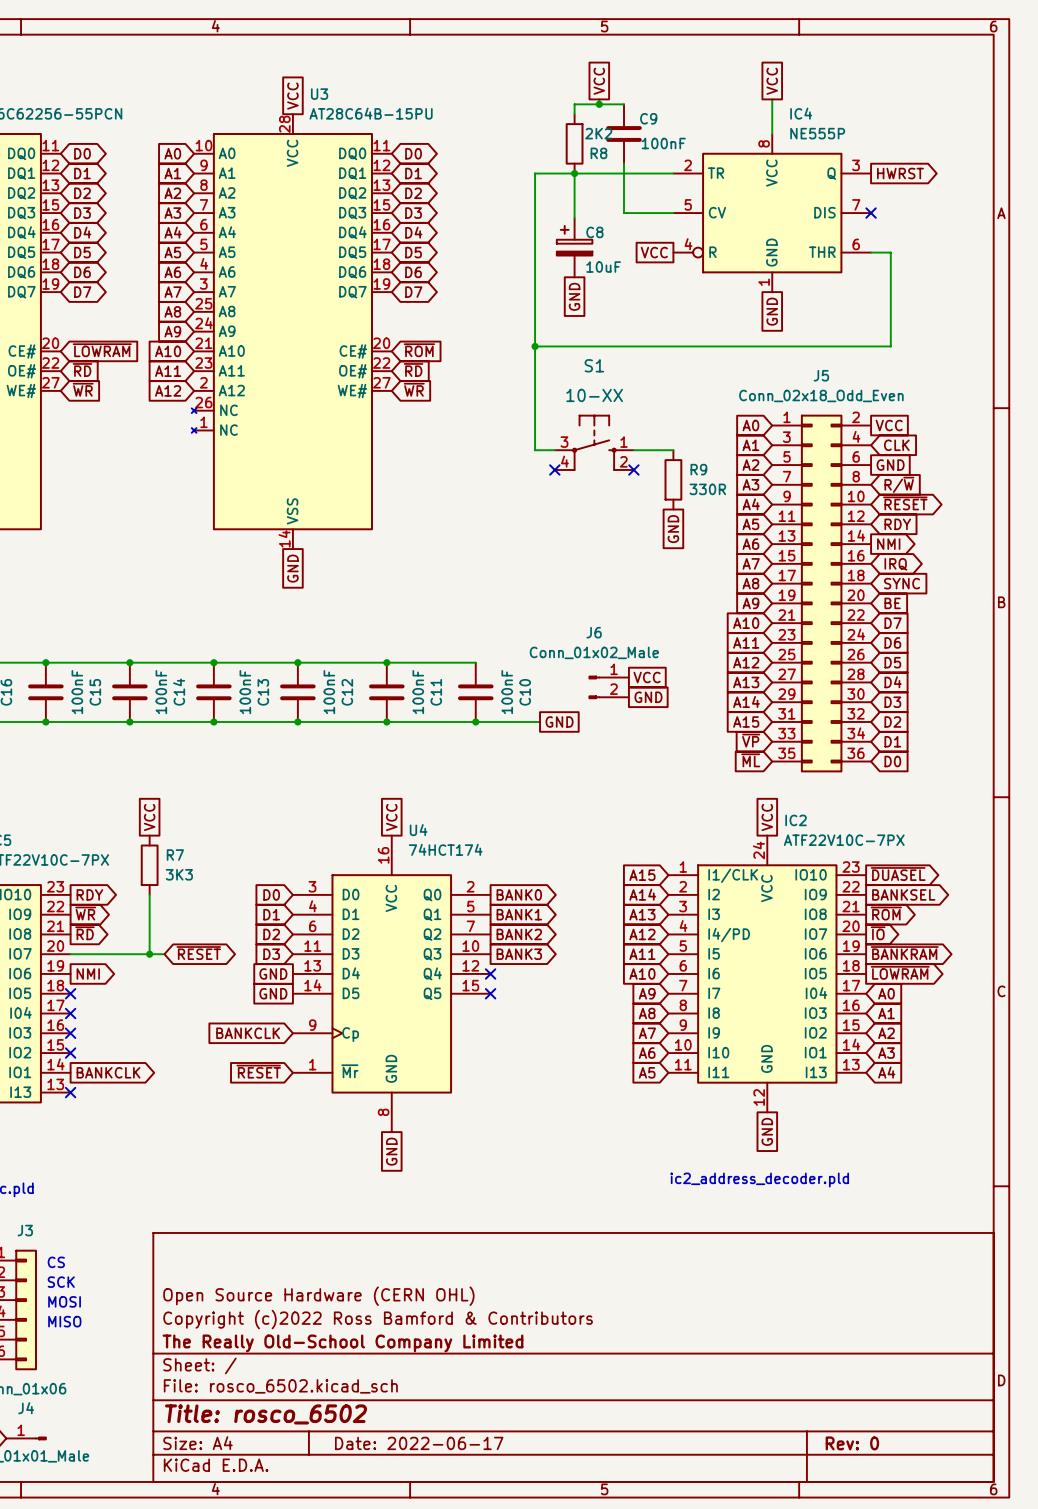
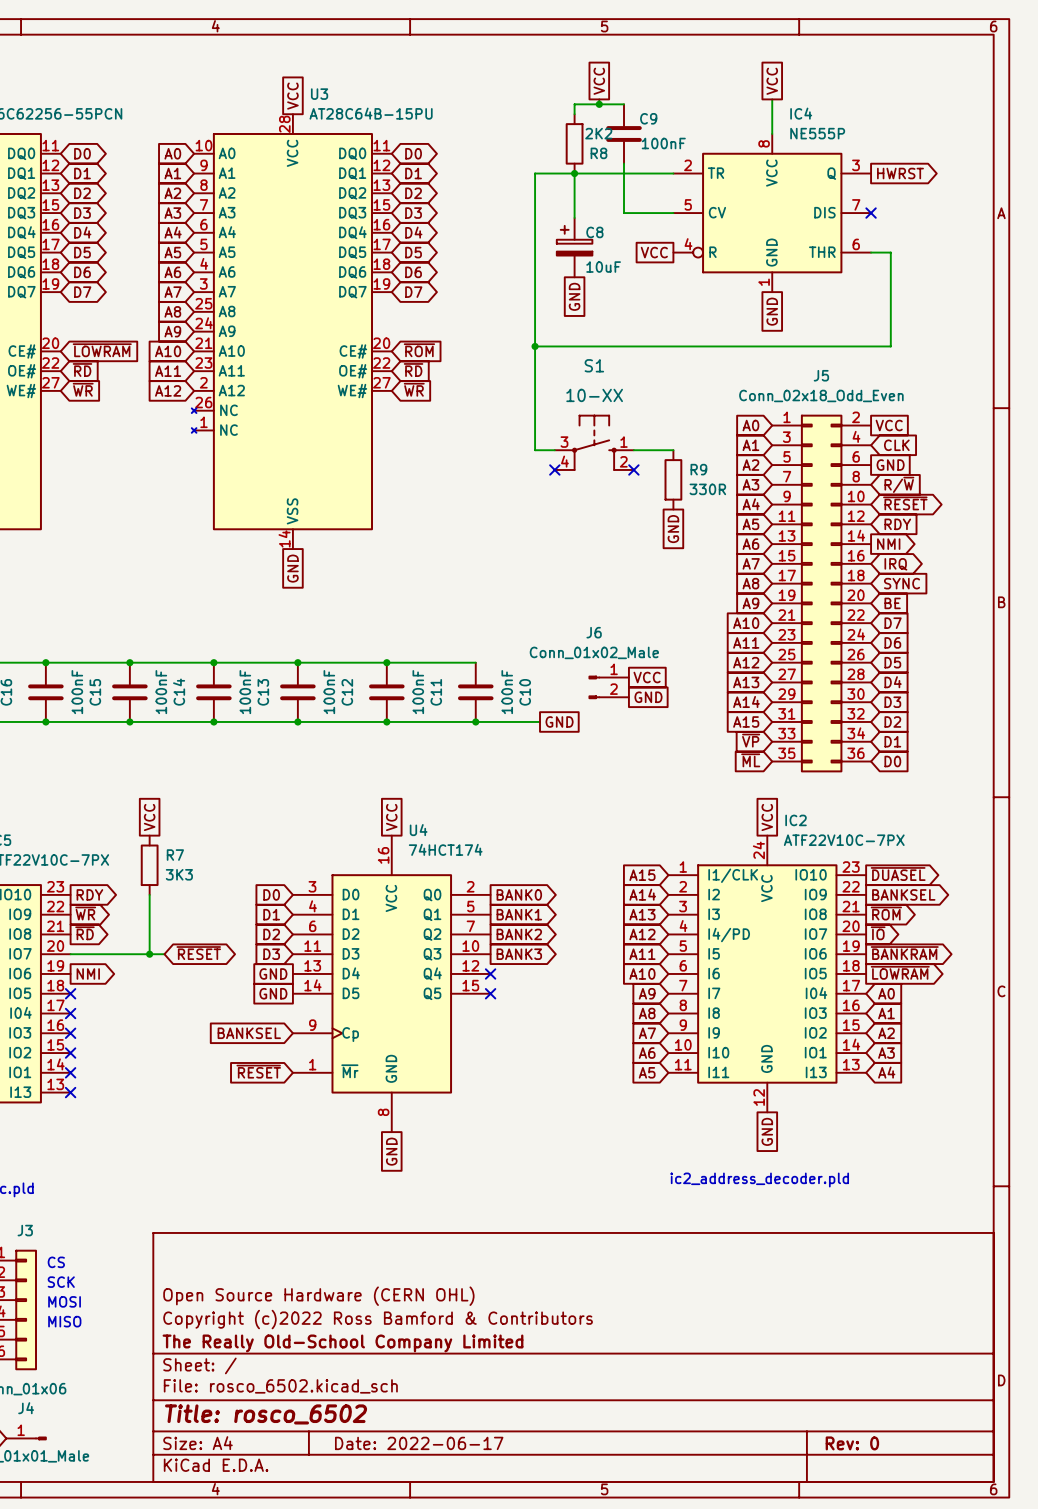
global label: BANKCLK (248, 1033) -> BANKSEL (249, 1033)
no-connect mark: none -> (70, 1072)
global label: BANKCLK (108, 1072) -> none

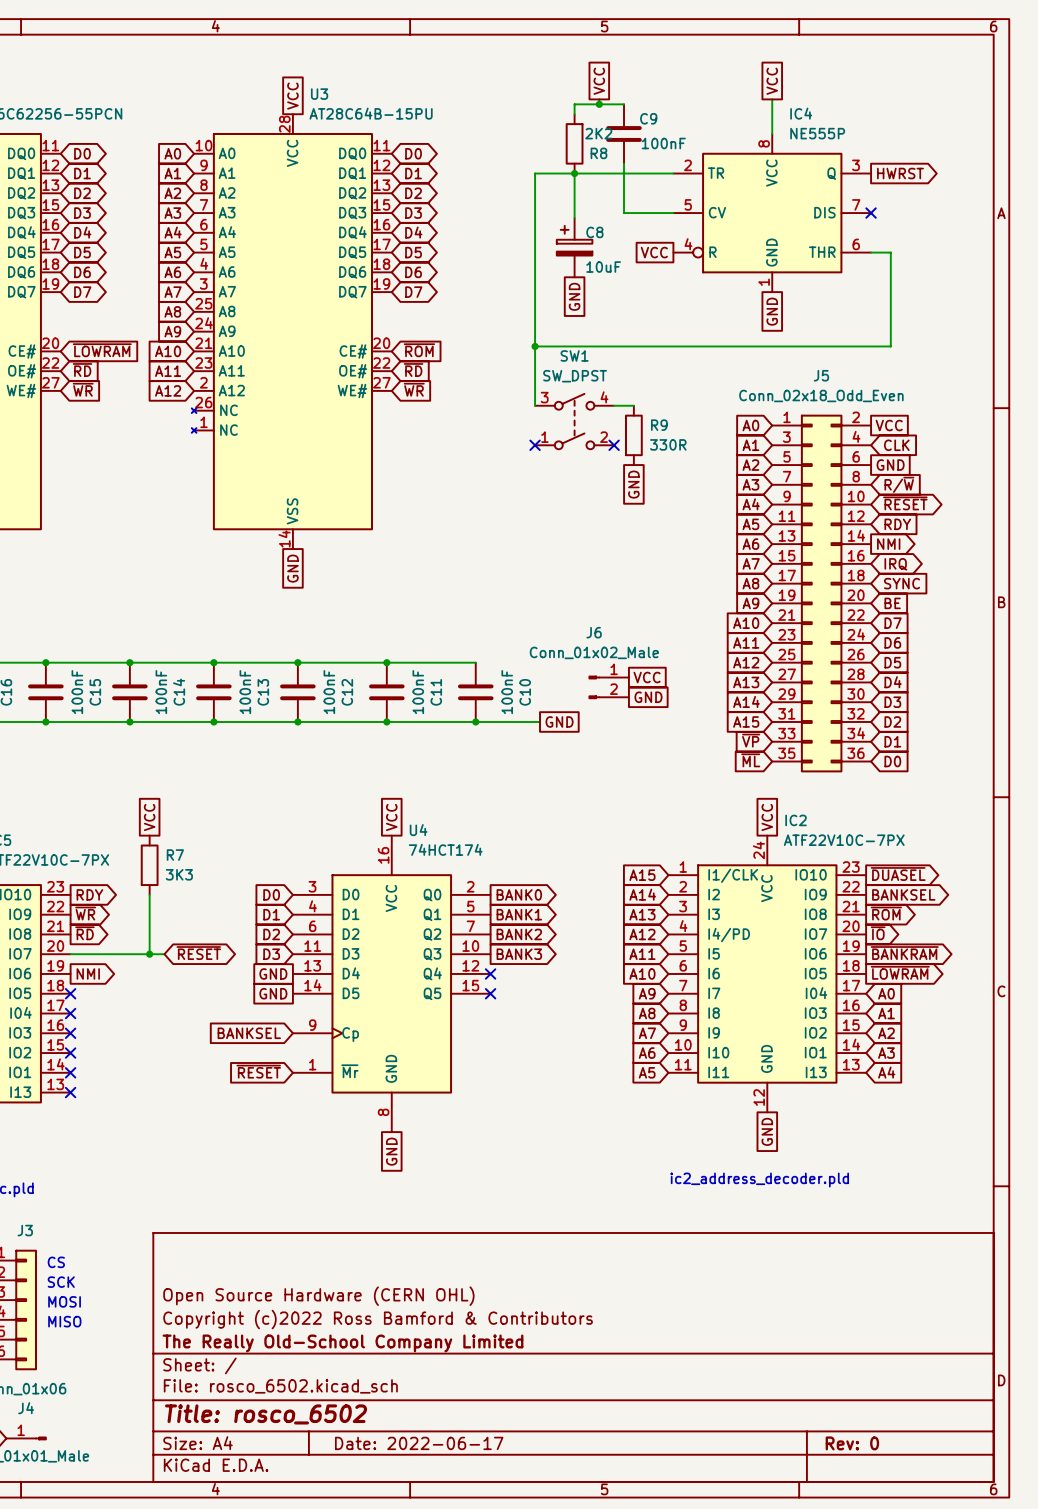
wire: (535, 405) (535, 450) (554, 450) -> none
wire: none -> (614, 405) (633, 405)
SW1: none -> SW_DPST (574, 421)
S1: 10-XX (594, 442) -> none
wire: (633, 450) (673, 450) -> none
no-connect mark position: (554, 469) -> (535, 445)
no-connect mark position: (633, 469) -> (614, 445)
R9 position: (673, 479) -> (633, 435)
global label position: GND (673, 529) -> GND (633, 484)

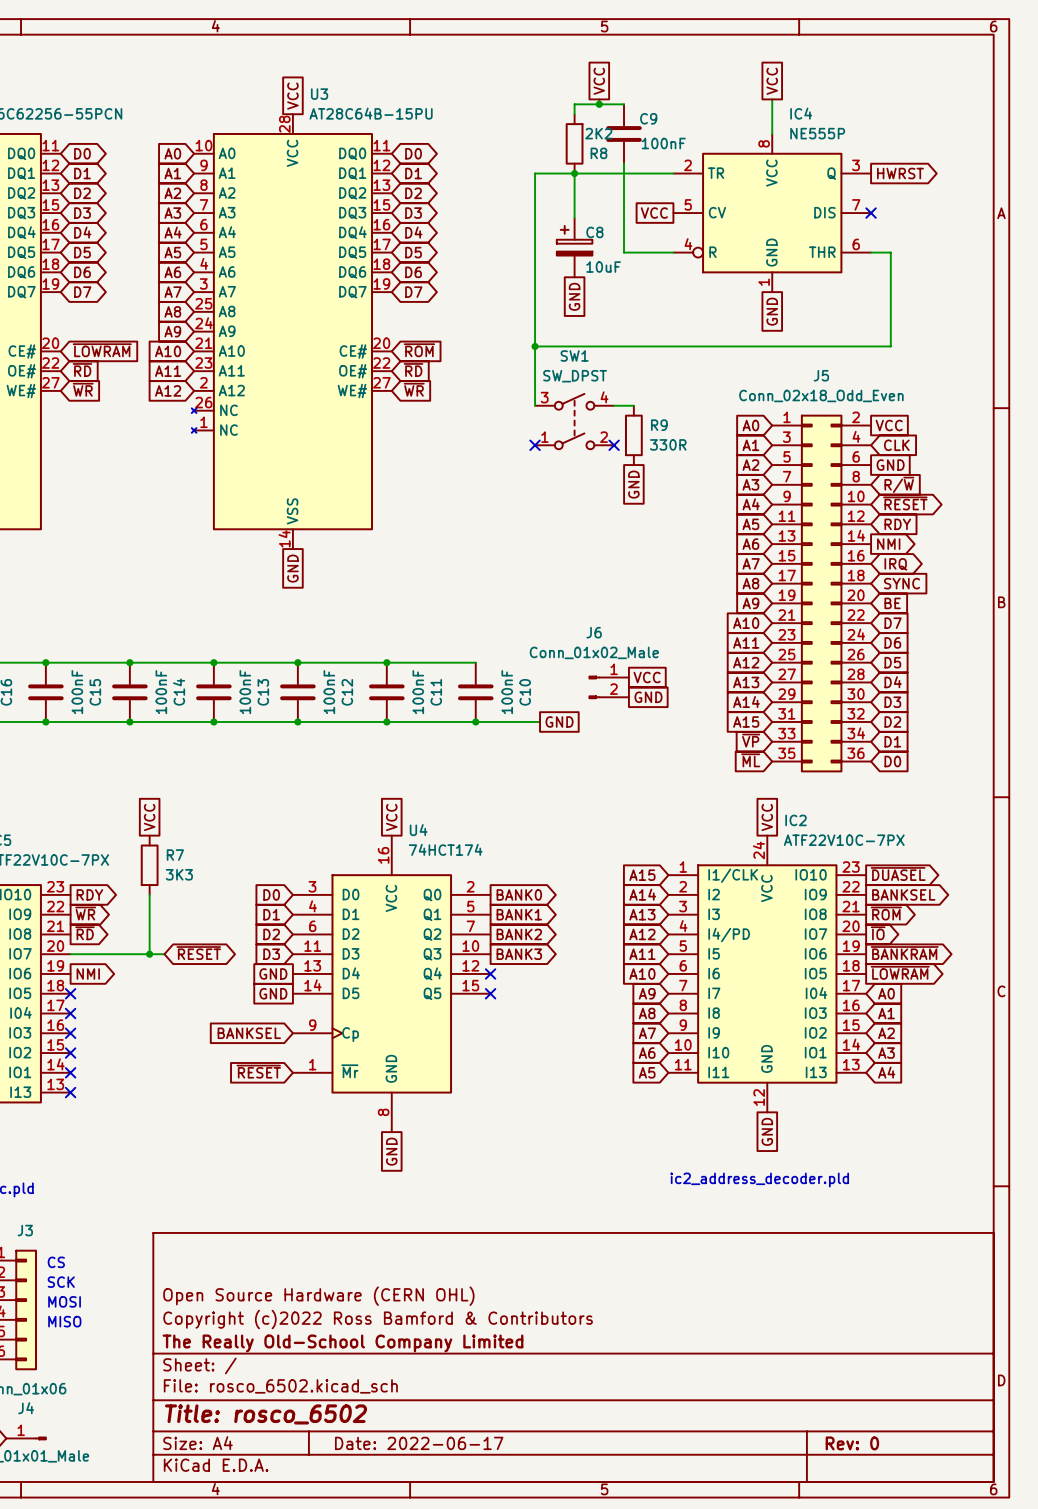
wire: (624, 213) (673, 213) -> (624, 213) (624, 252) (673, 252)
global label position: VCC (654, 252) -> VCC (654, 213)

